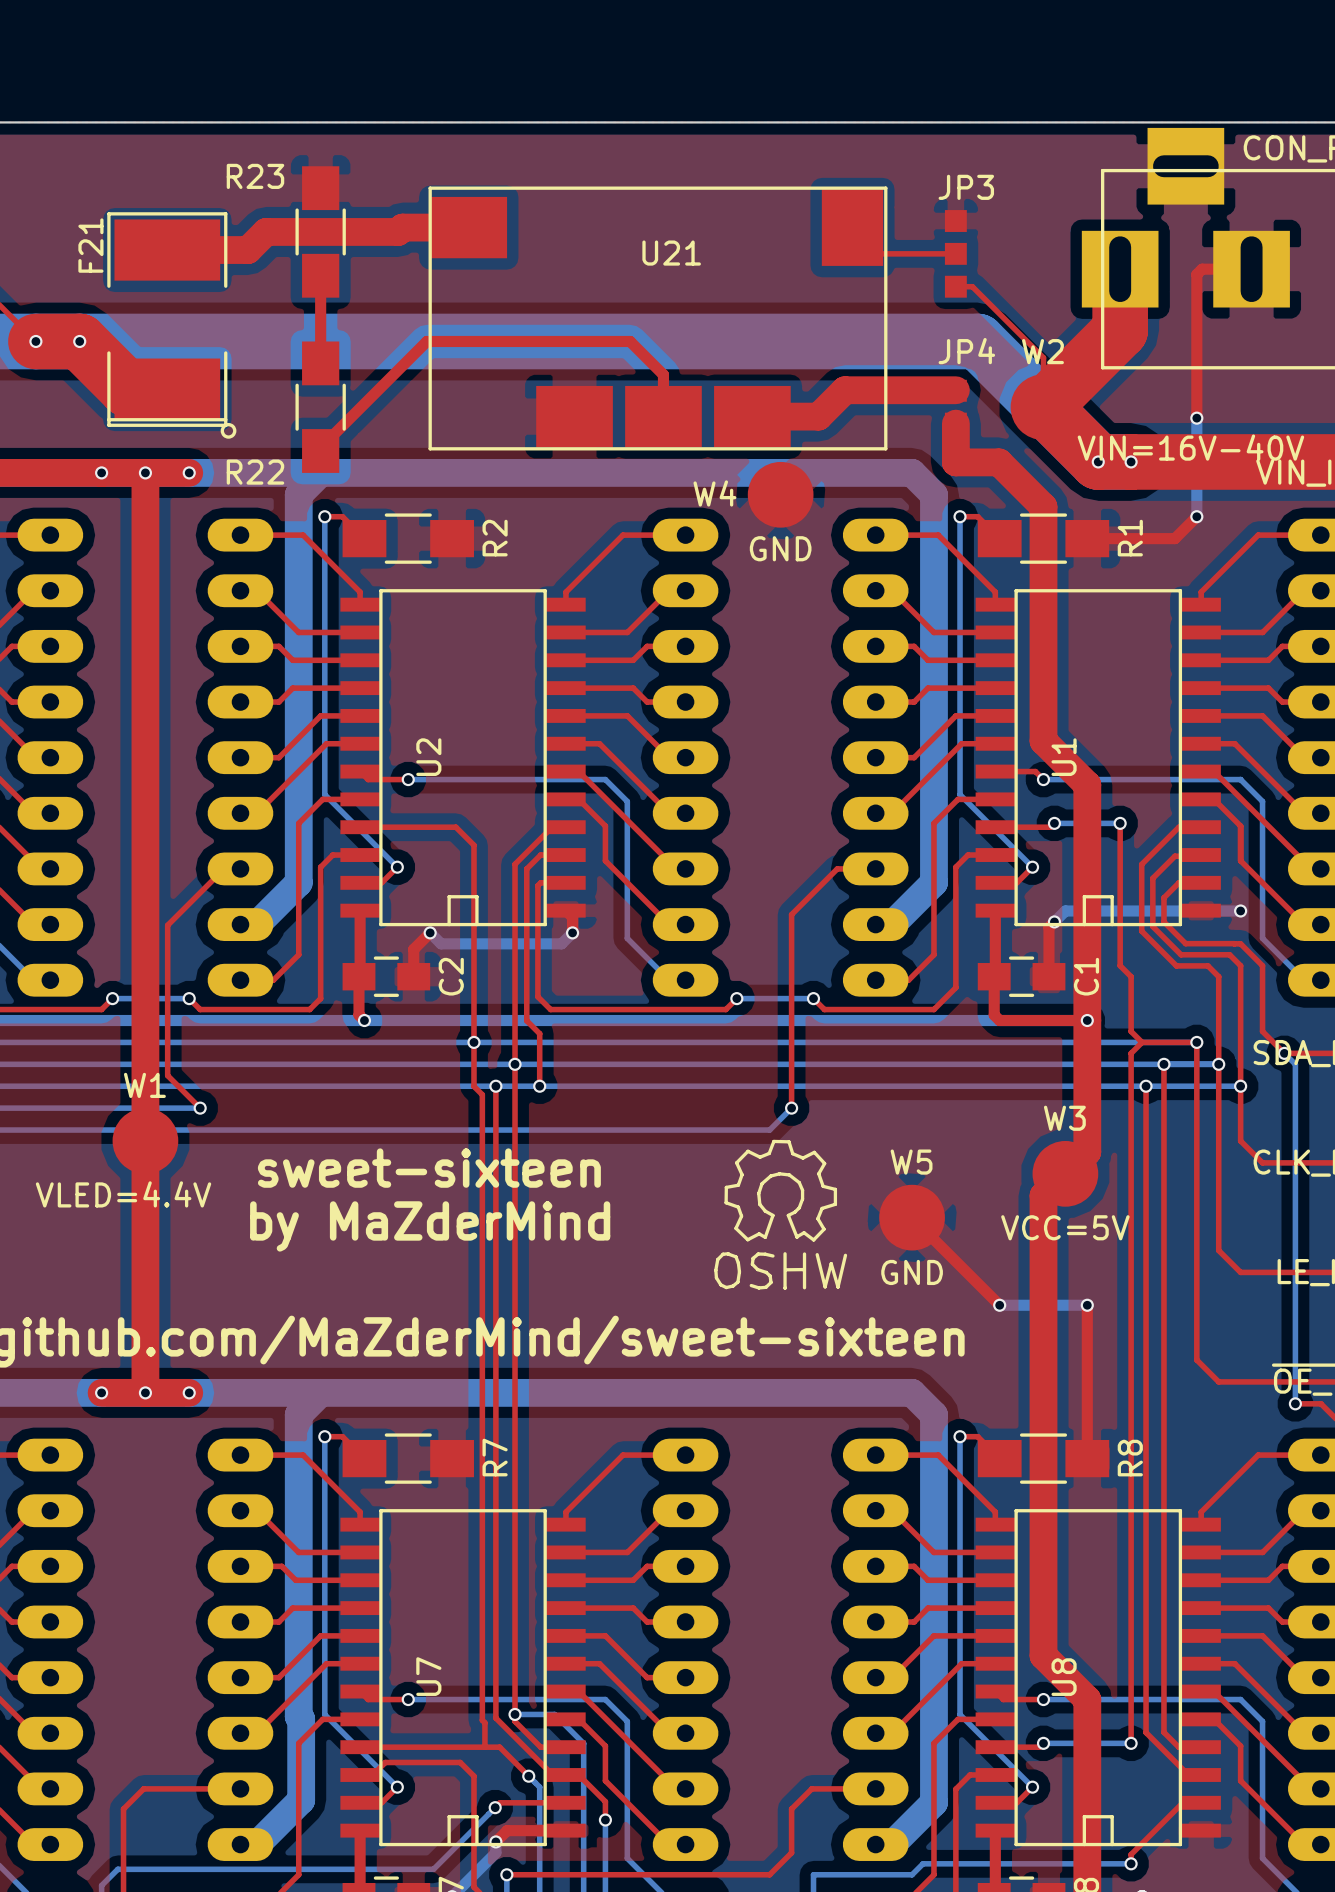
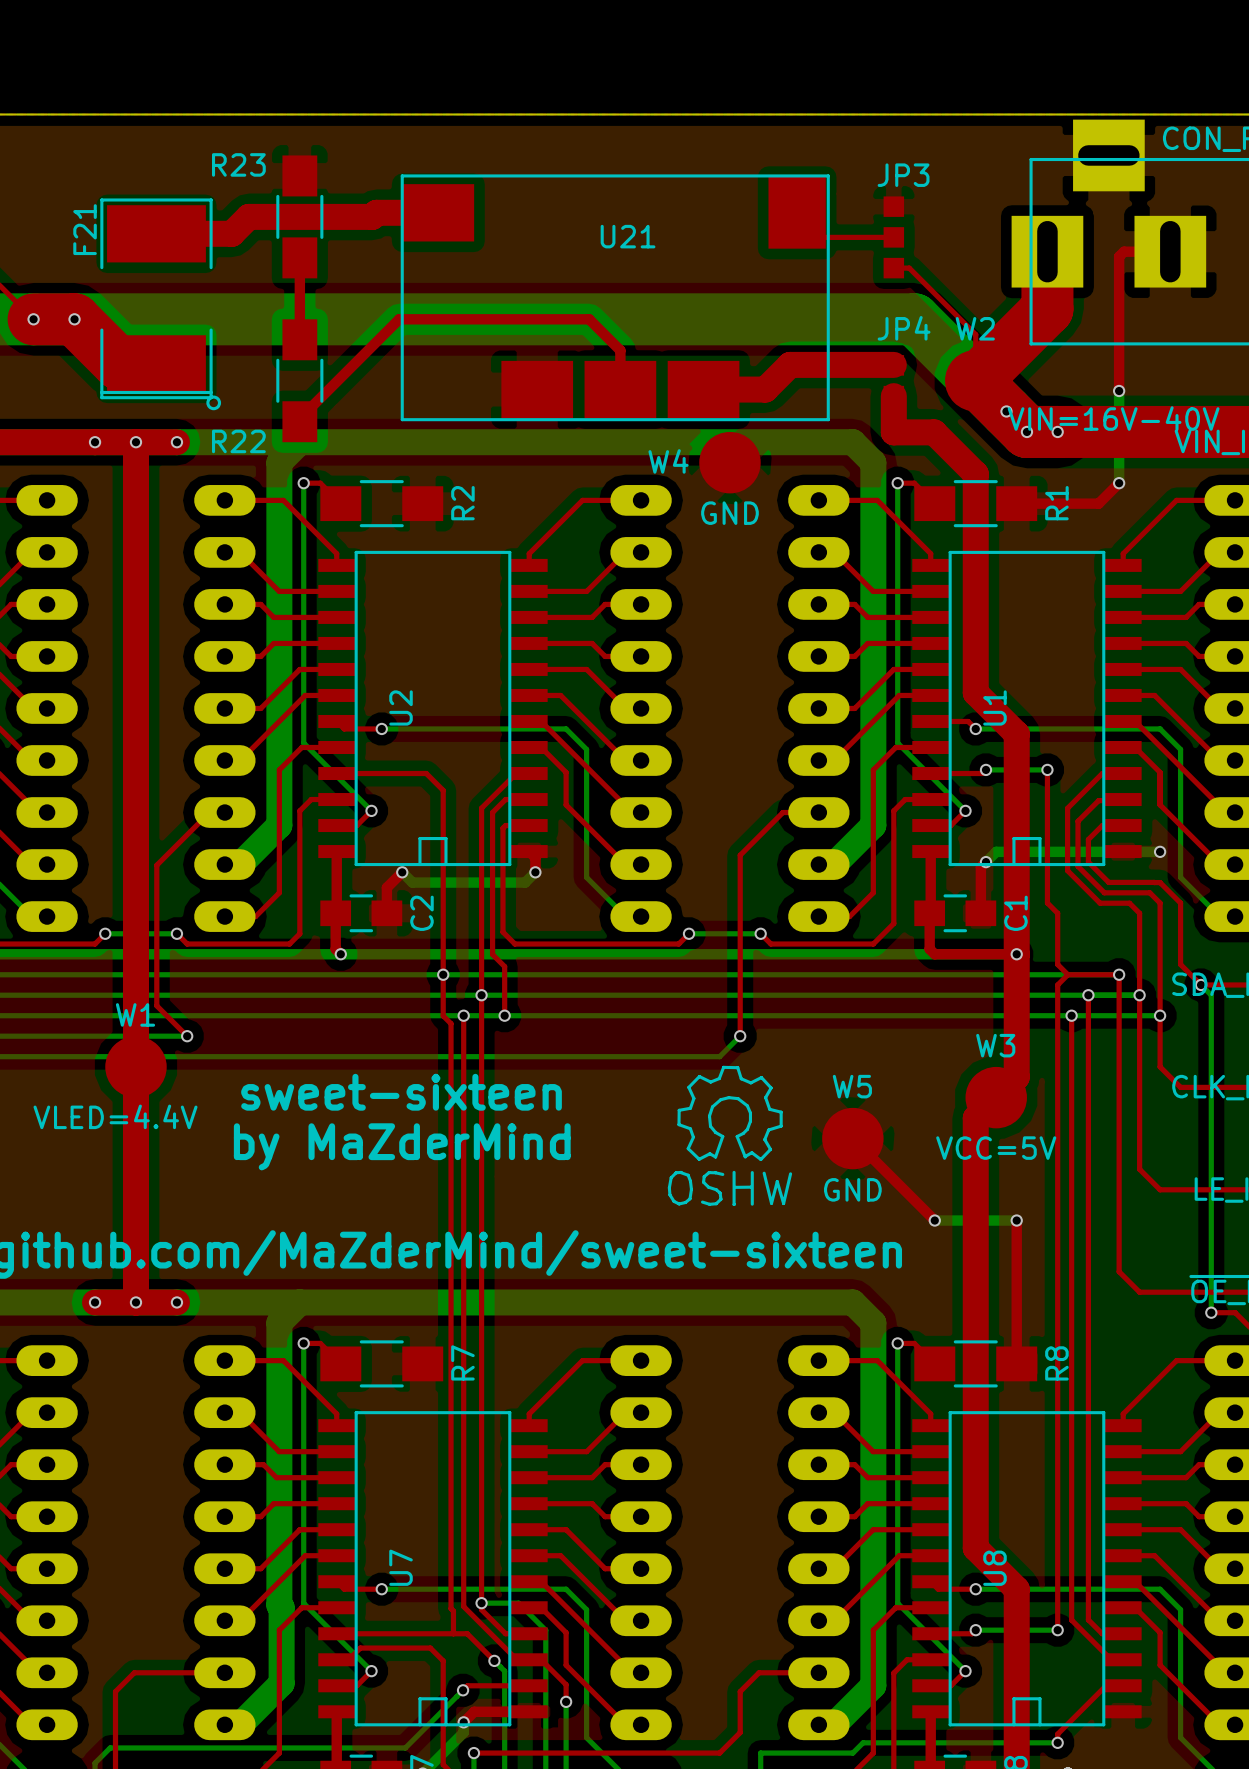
via: none -> (1006, 411)

